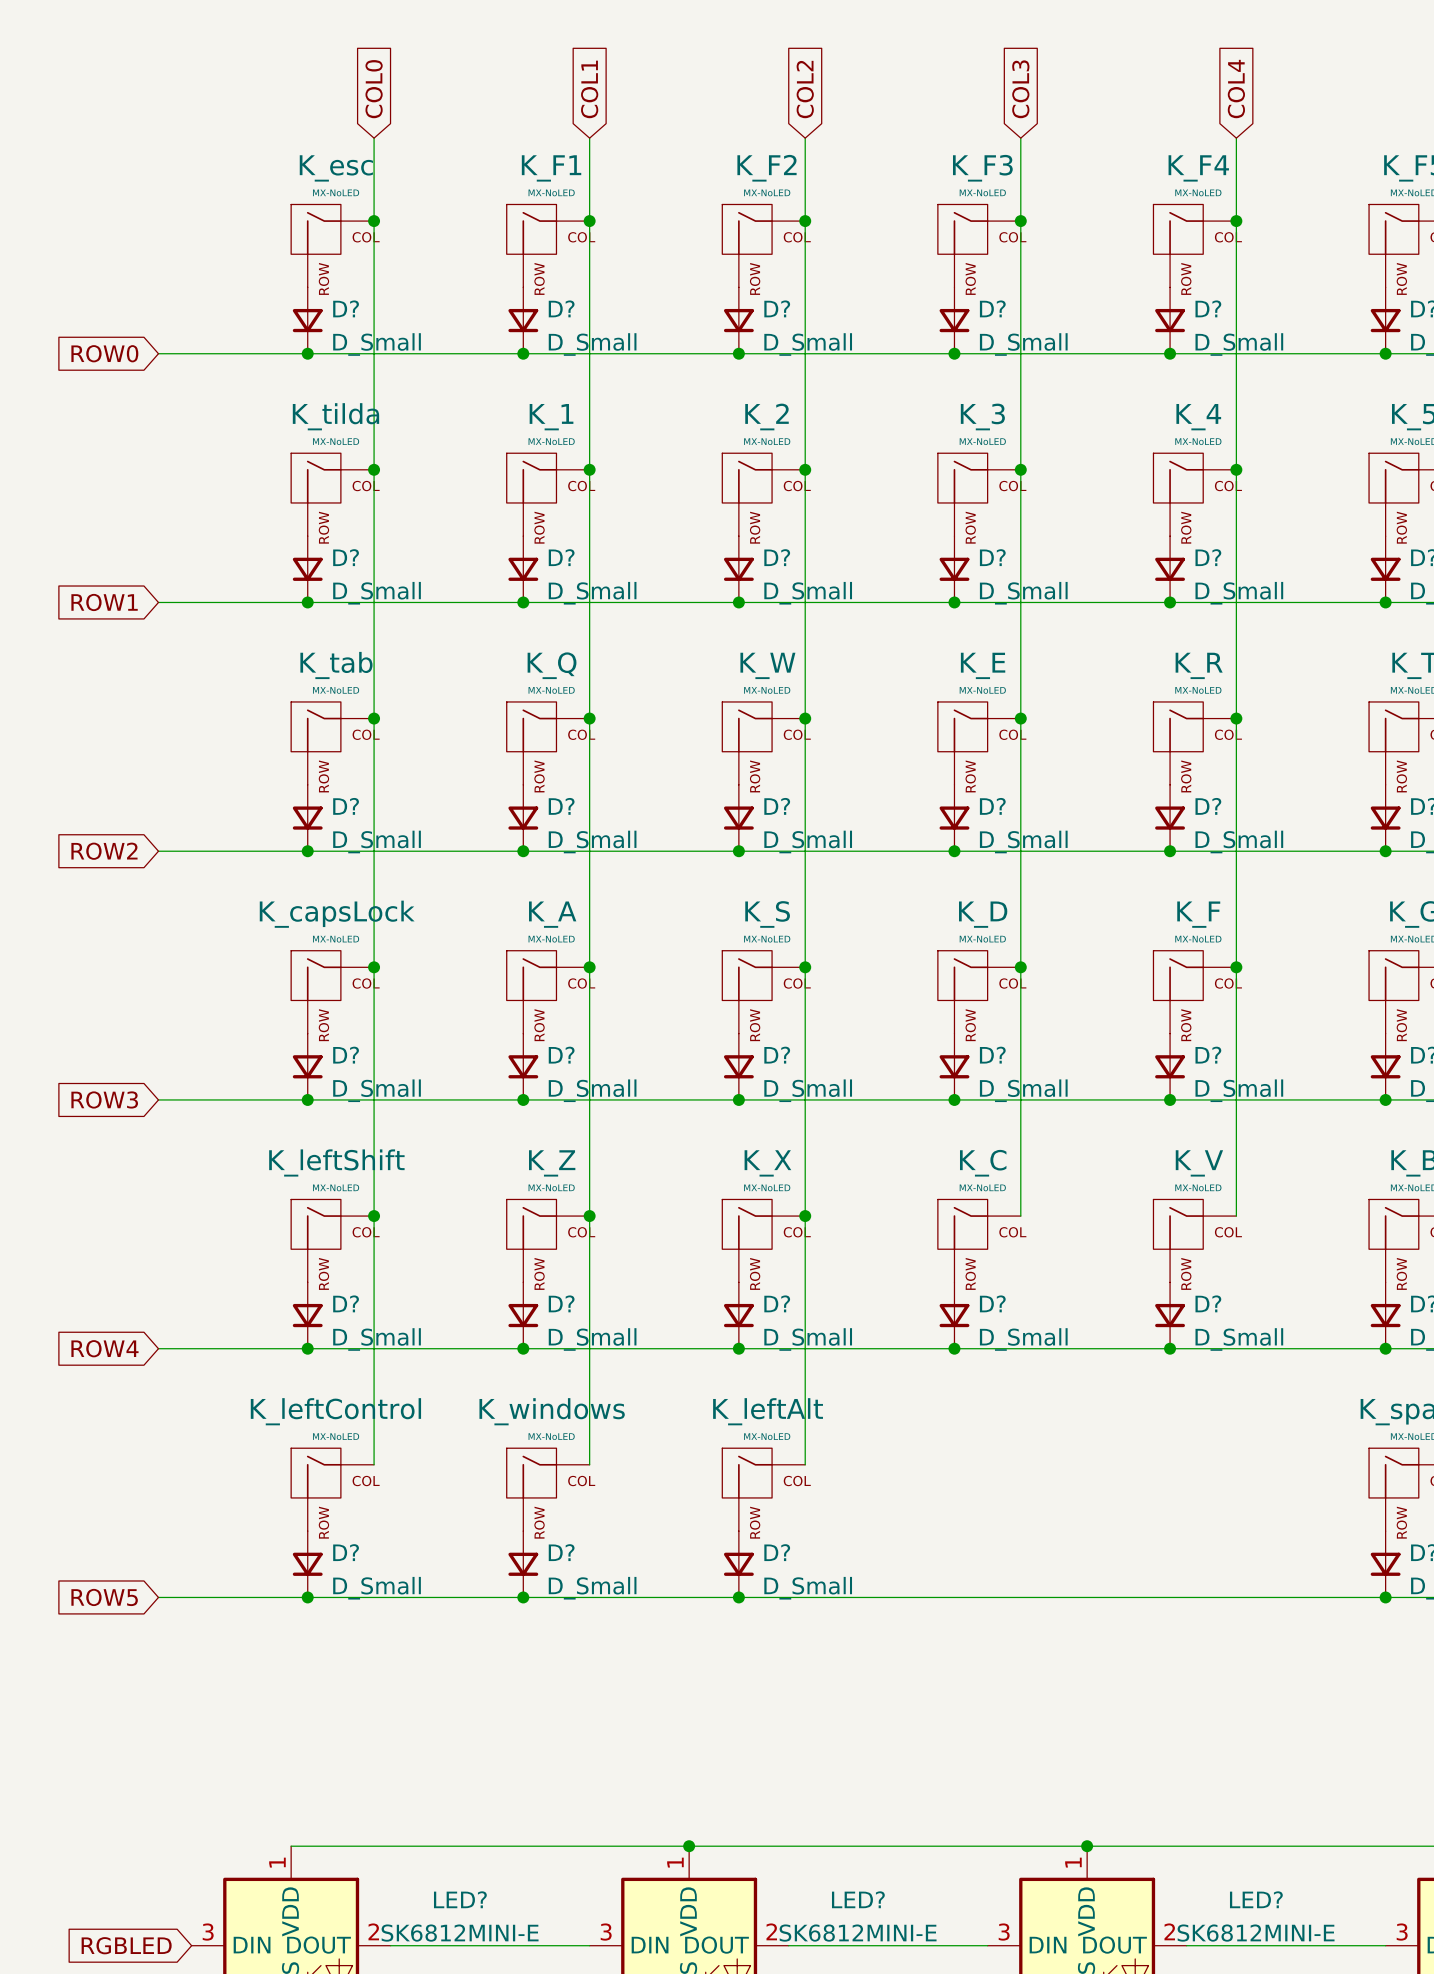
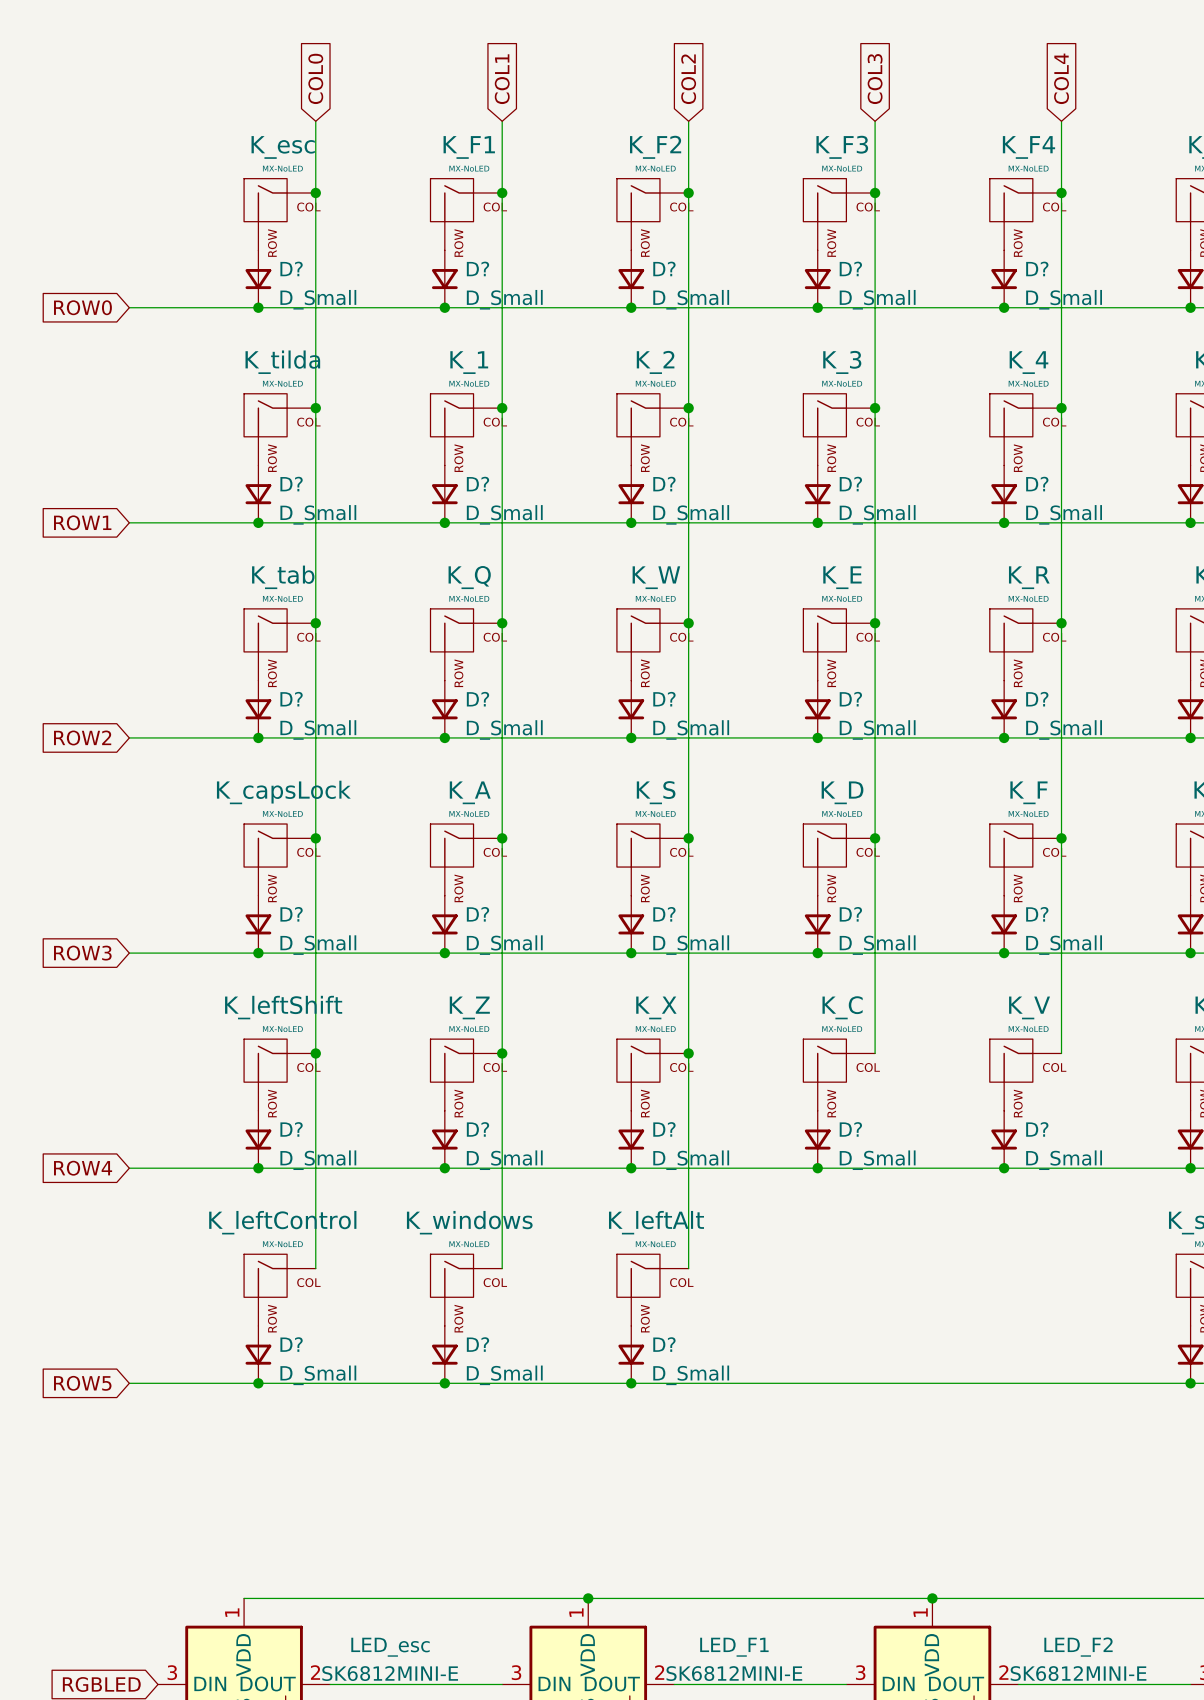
LED? name: LED? (460, 1899) -> LED_esc (390, 1647)
LED? name: LED? (858, 1899) -> LED_F1 (734, 1647)
LED? name: LED? (1256, 1899) -> LED_F2 (1078, 1647)

